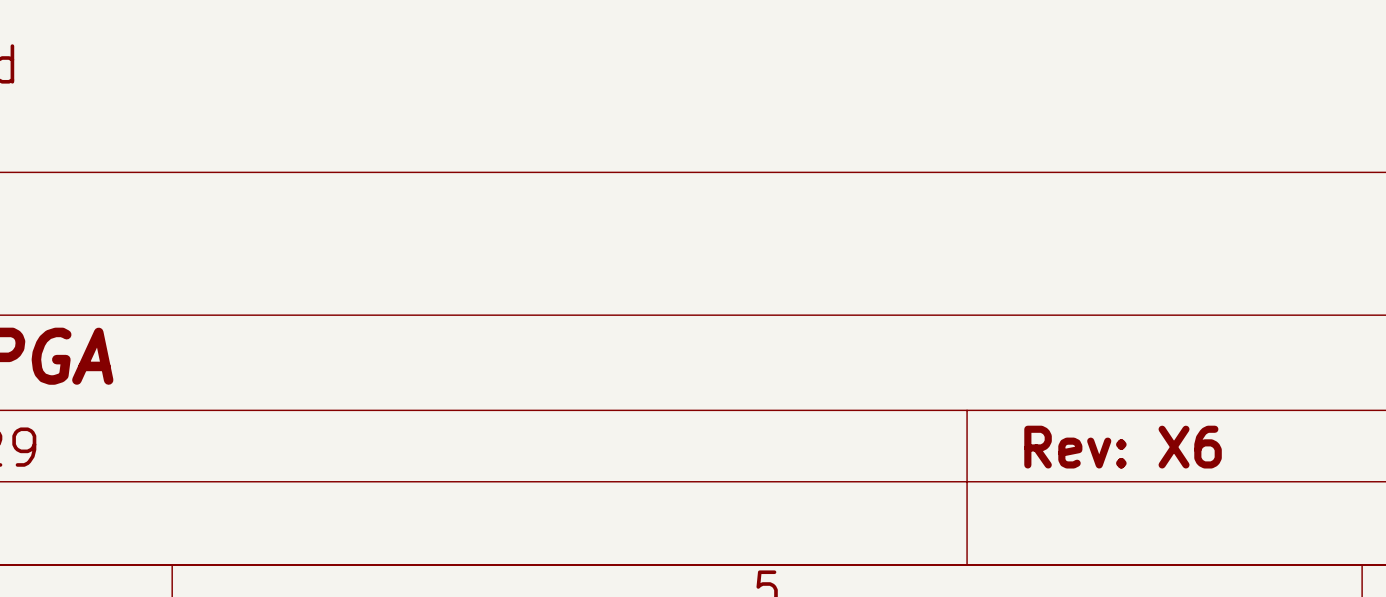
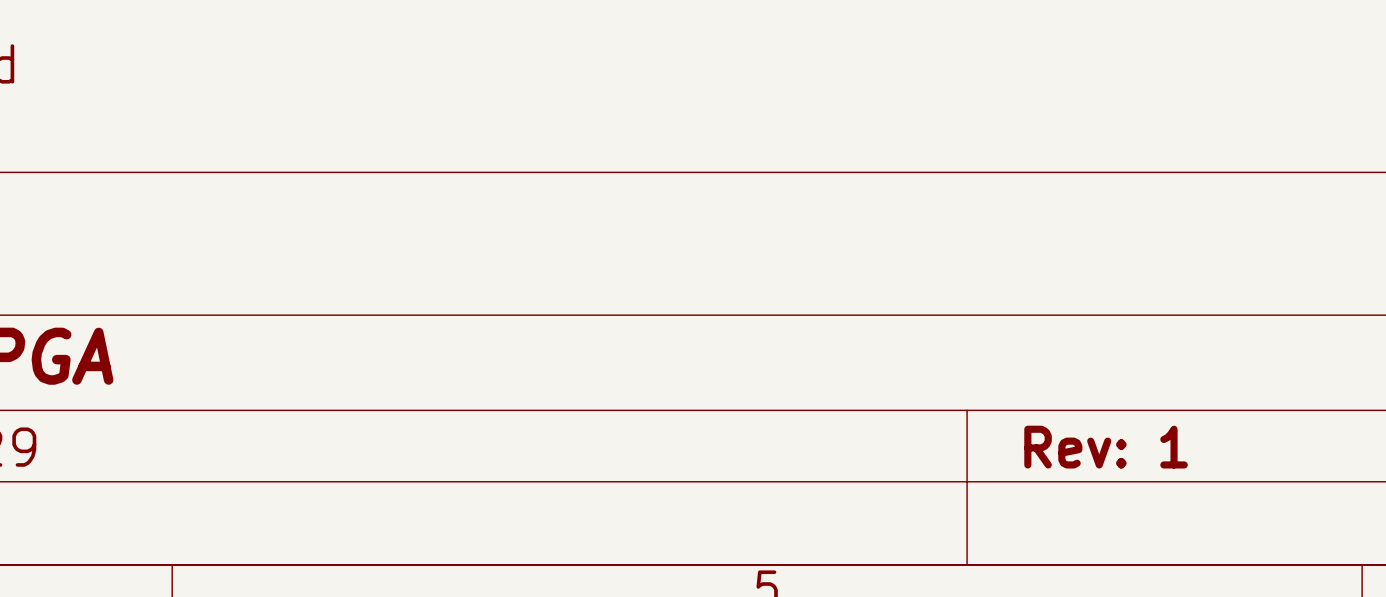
title block: Rev: X6 (1123, 447) -> Rev: 1 (1106, 447)

